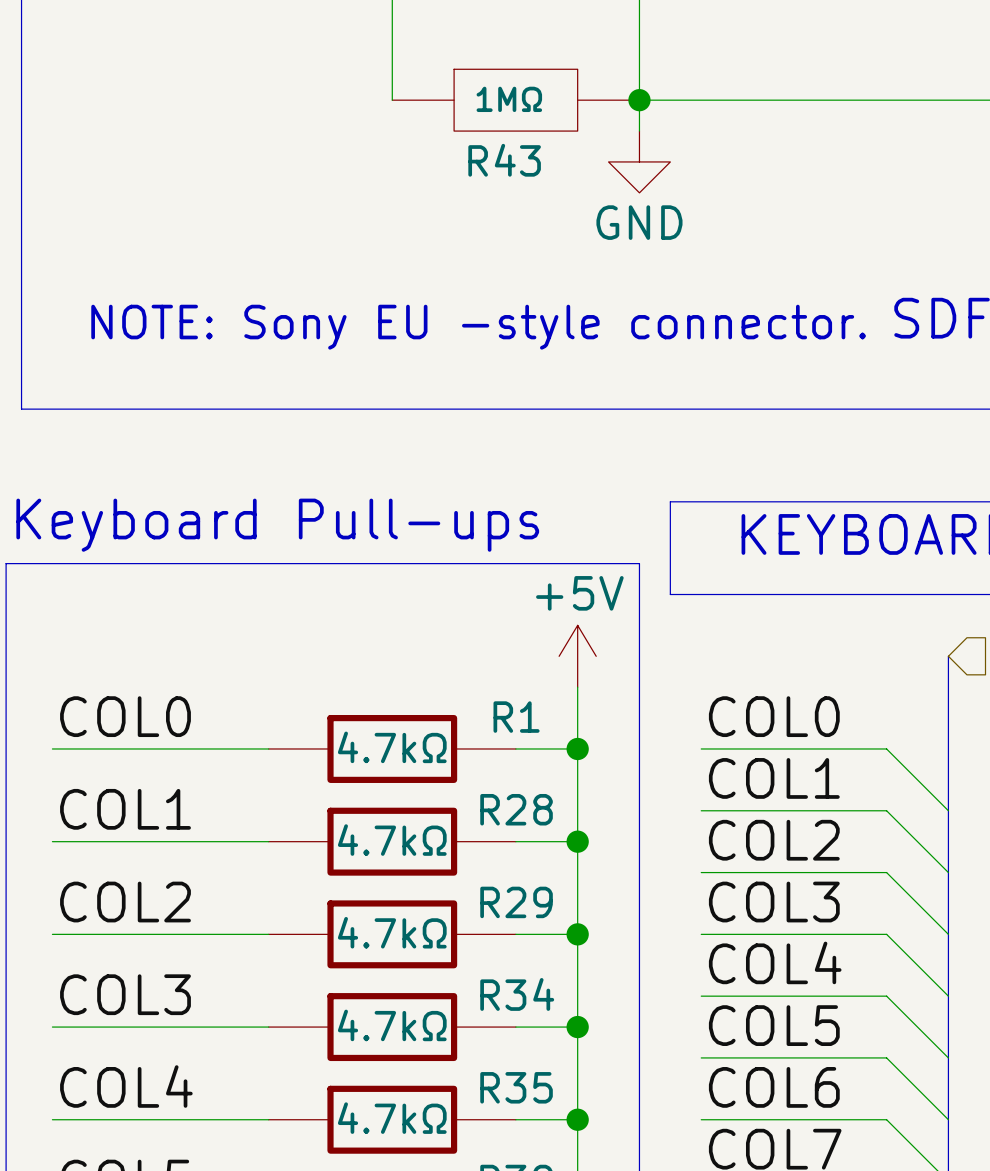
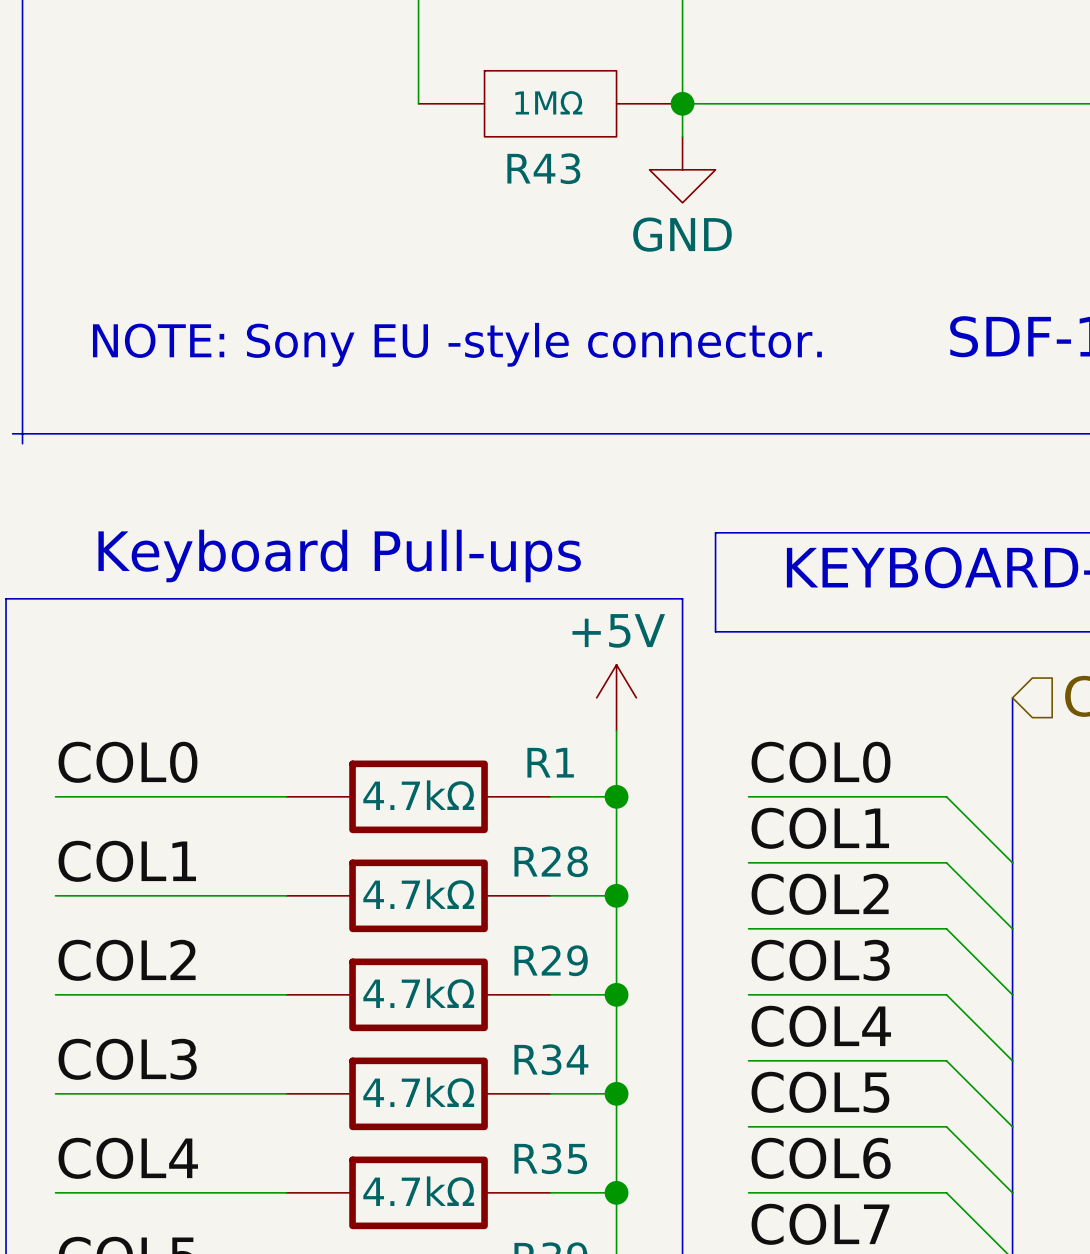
line: none -> (12, 433) (22, 433) (22, 443)

